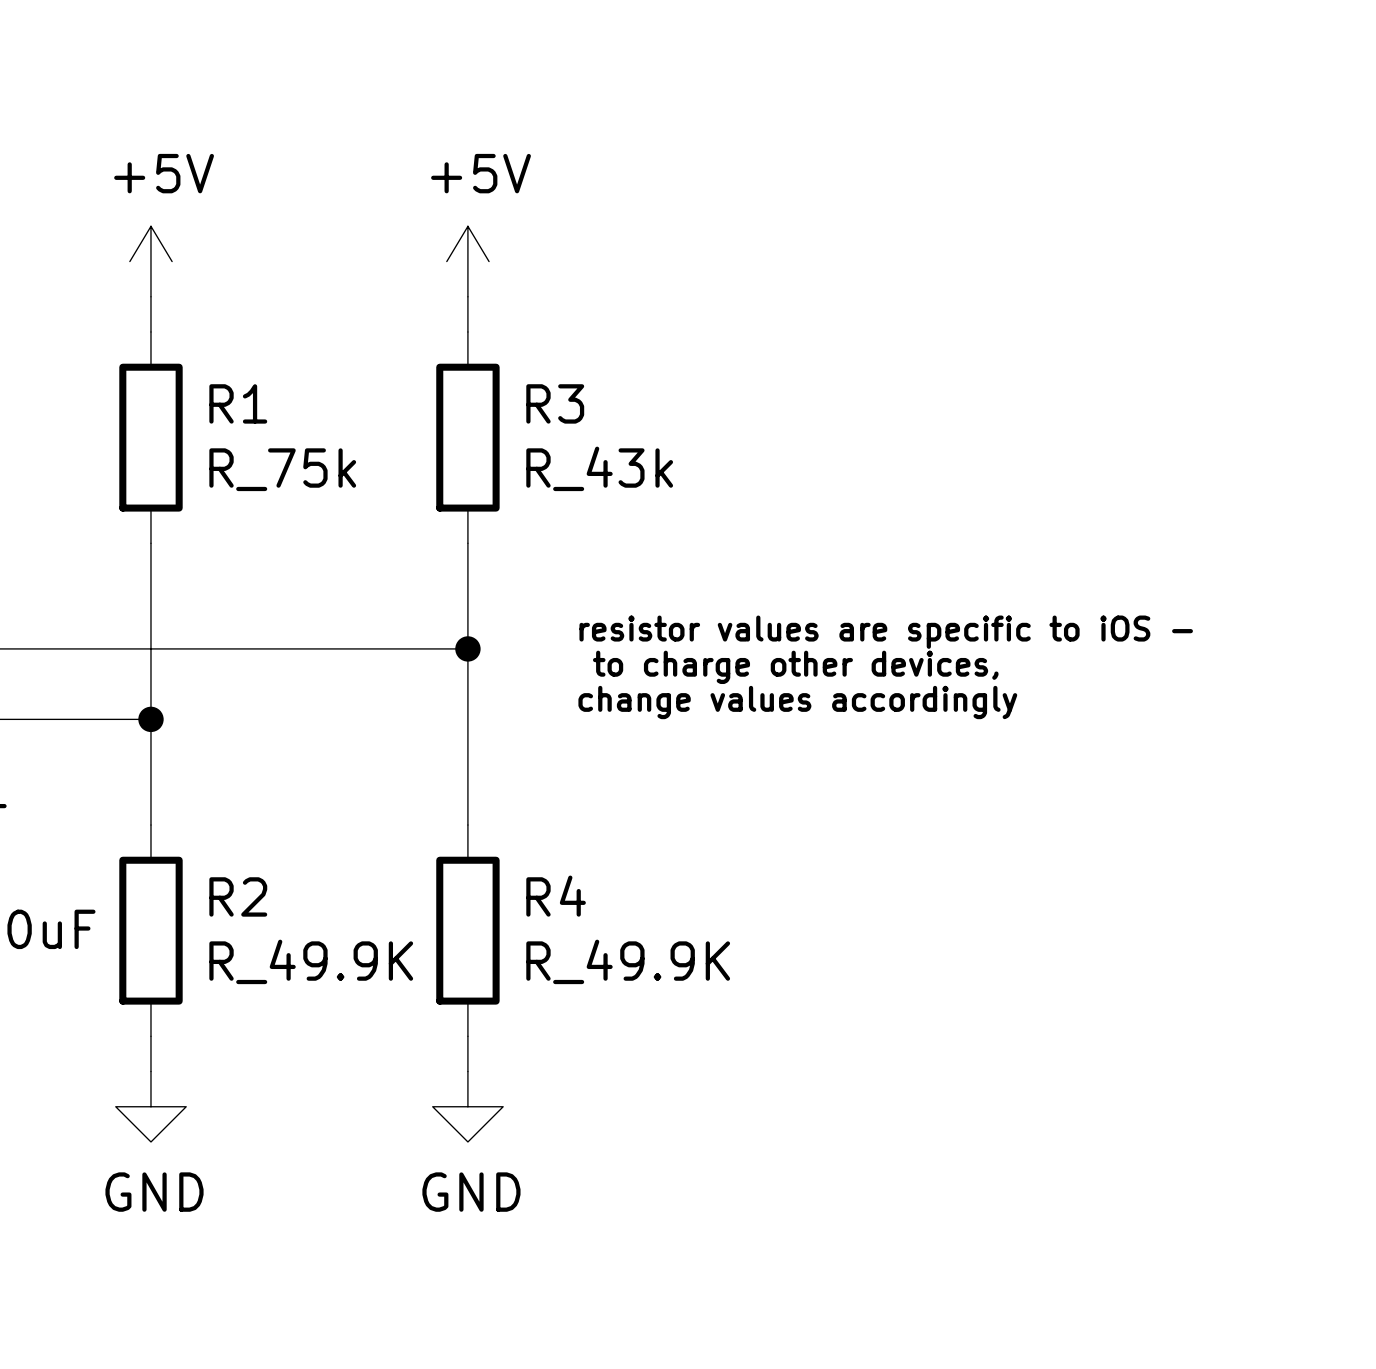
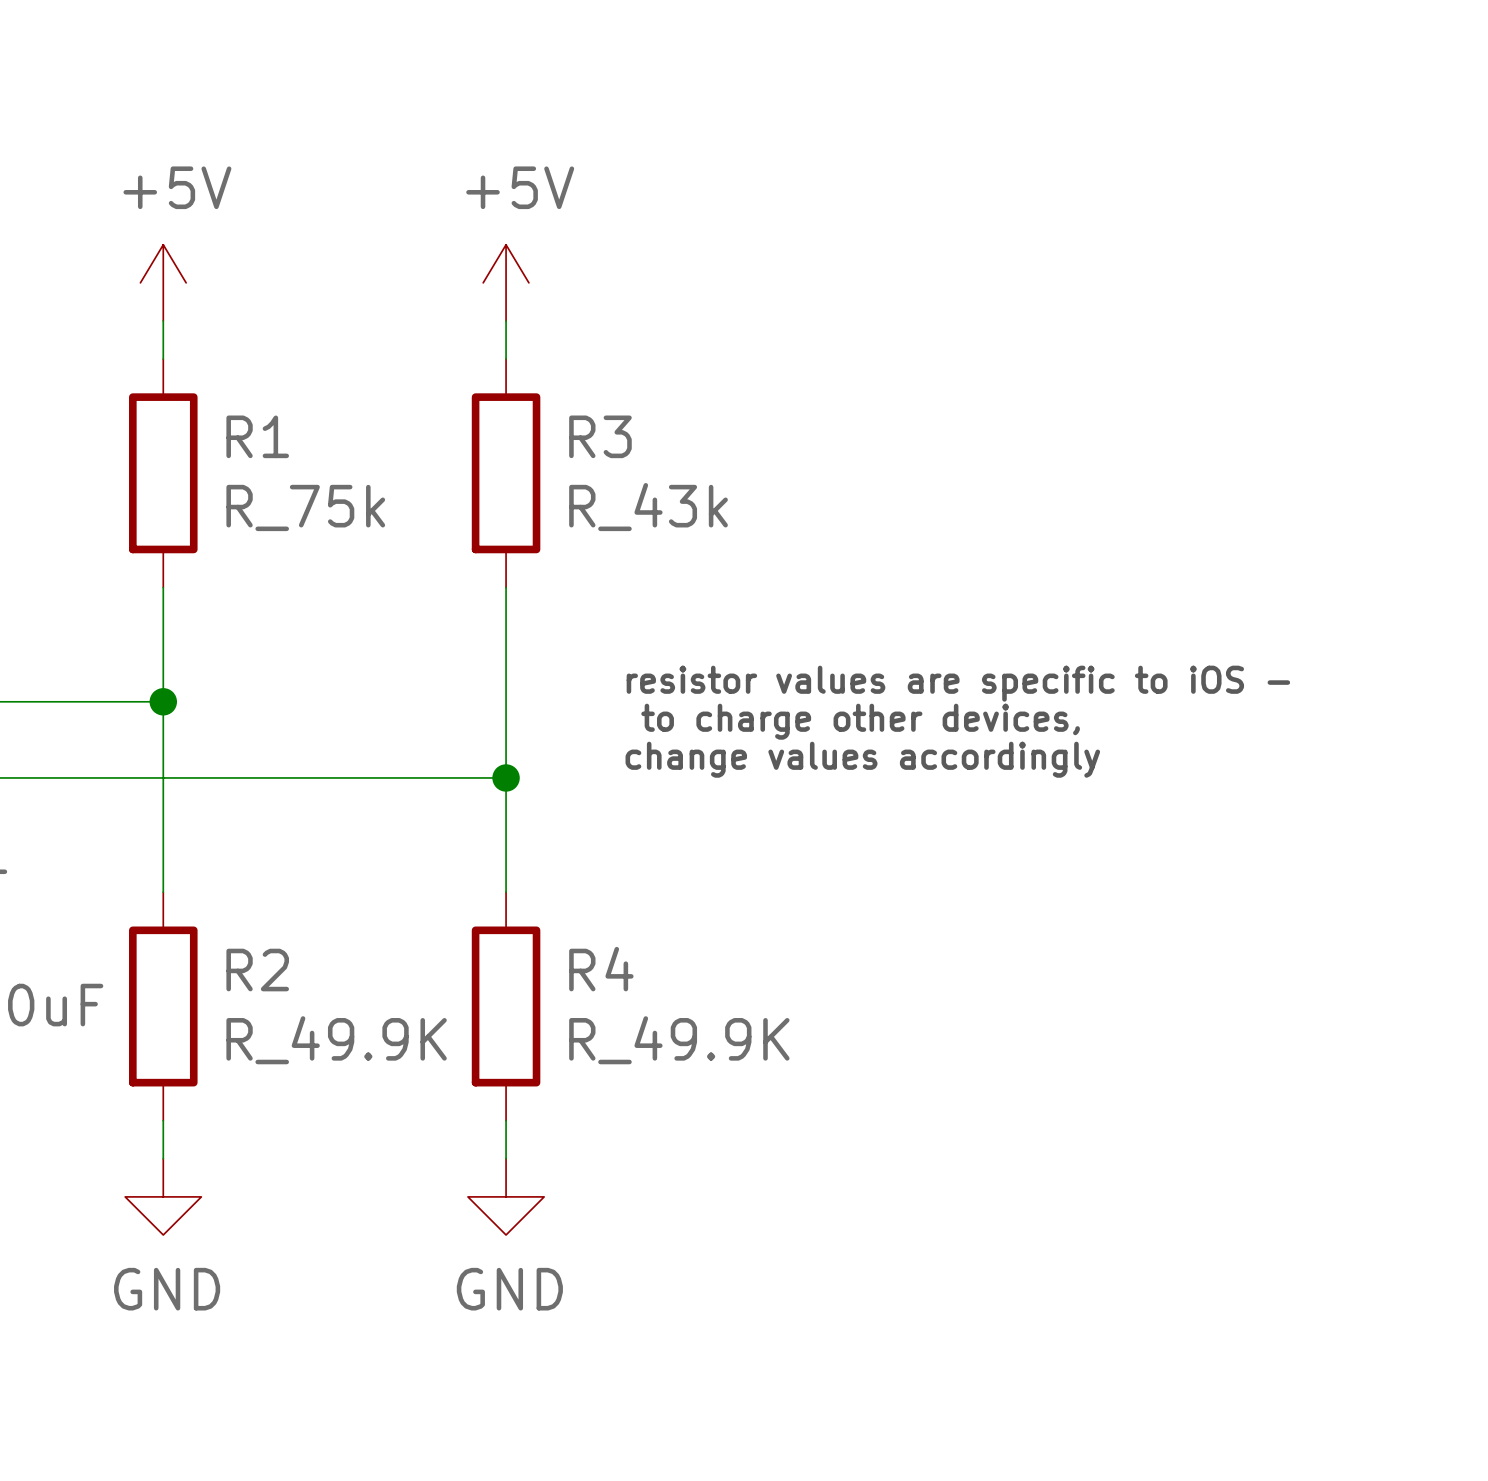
wire: (150, 648) (467, 648) -> (163, 777) (506, 777)
junction position: (467, 648) -> (506, 777)
junction position: (150, 719) -> (163, 701)

